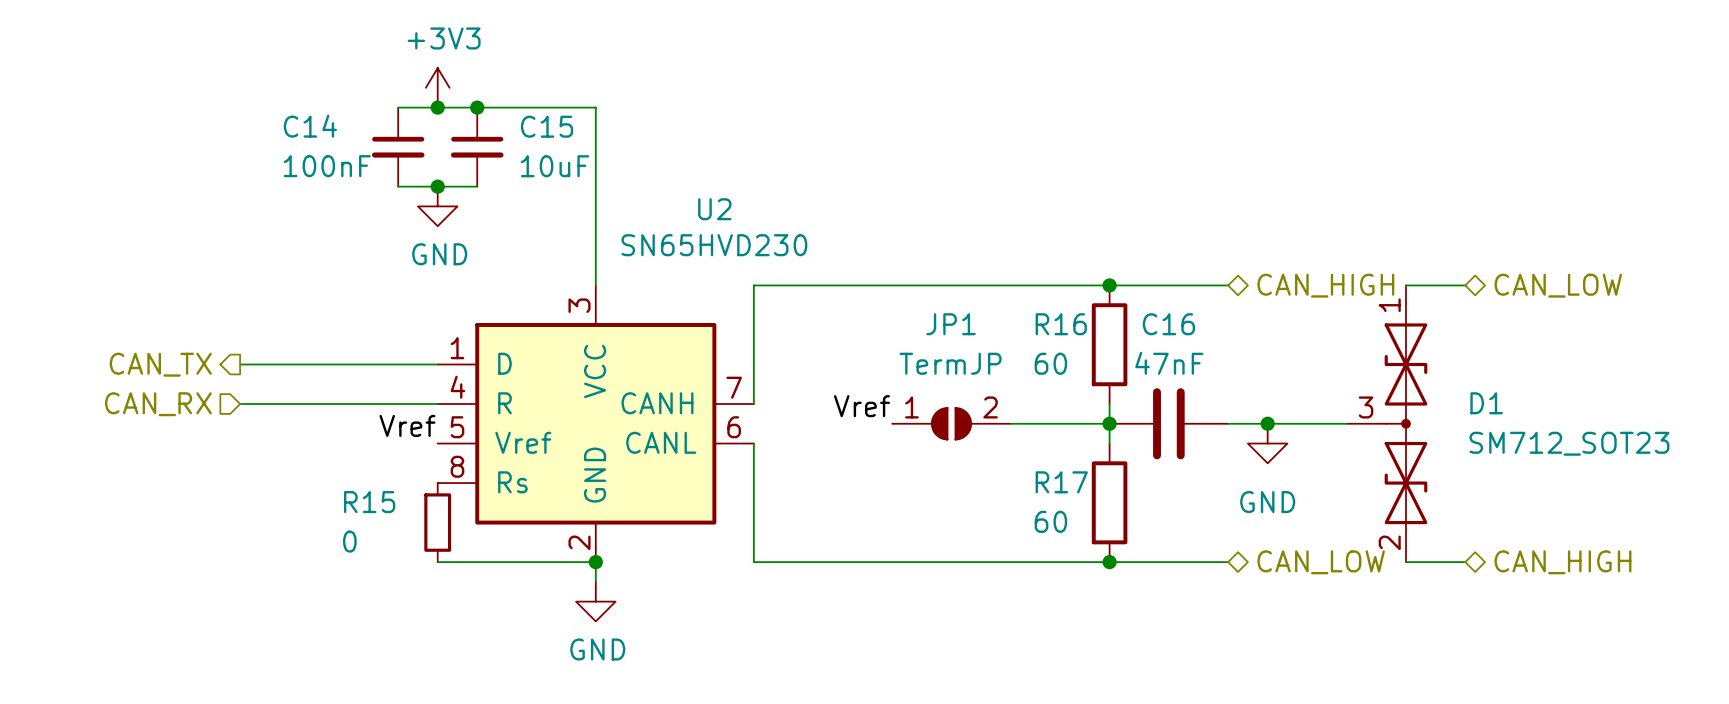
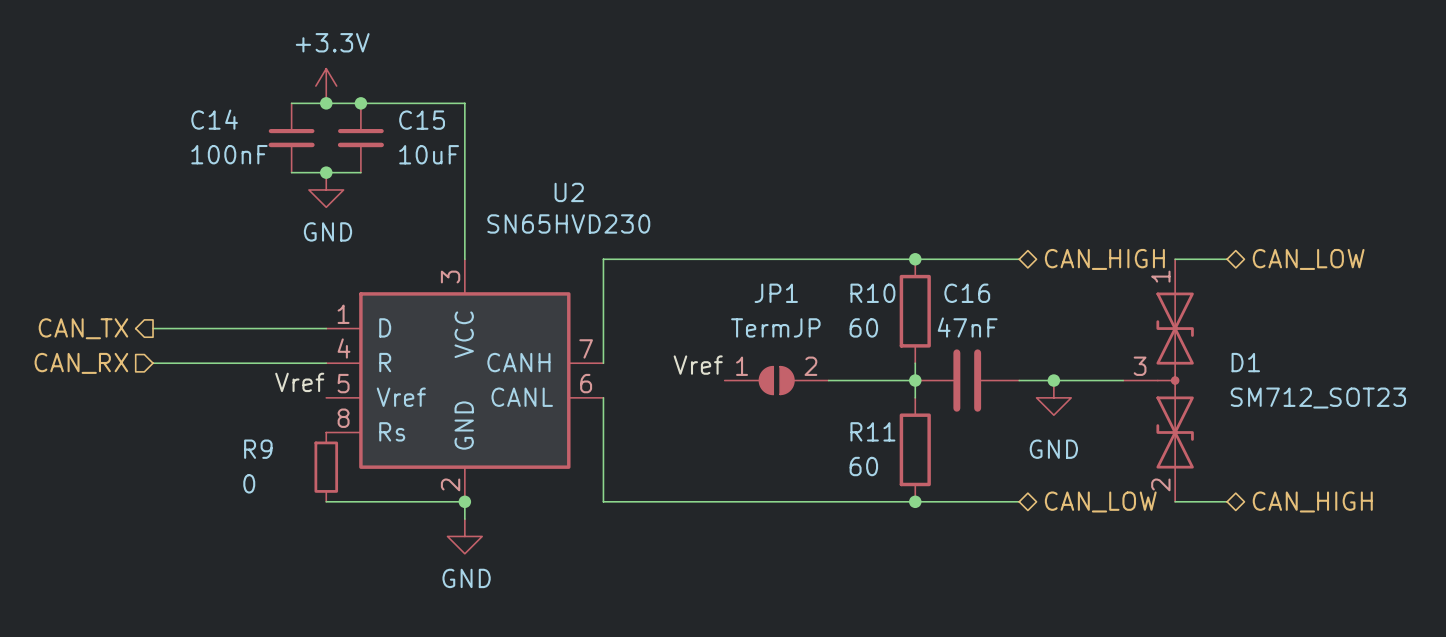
power symbol: +3V3 (437, 87) -> +3.3V (326, 86)
R16 name: R16 (1061, 324) -> R10 (872, 293)
R17 name: R17 (1061, 482) -> R11 (872, 431)
R15 name: R15 (369, 502) -> R9 (258, 449)

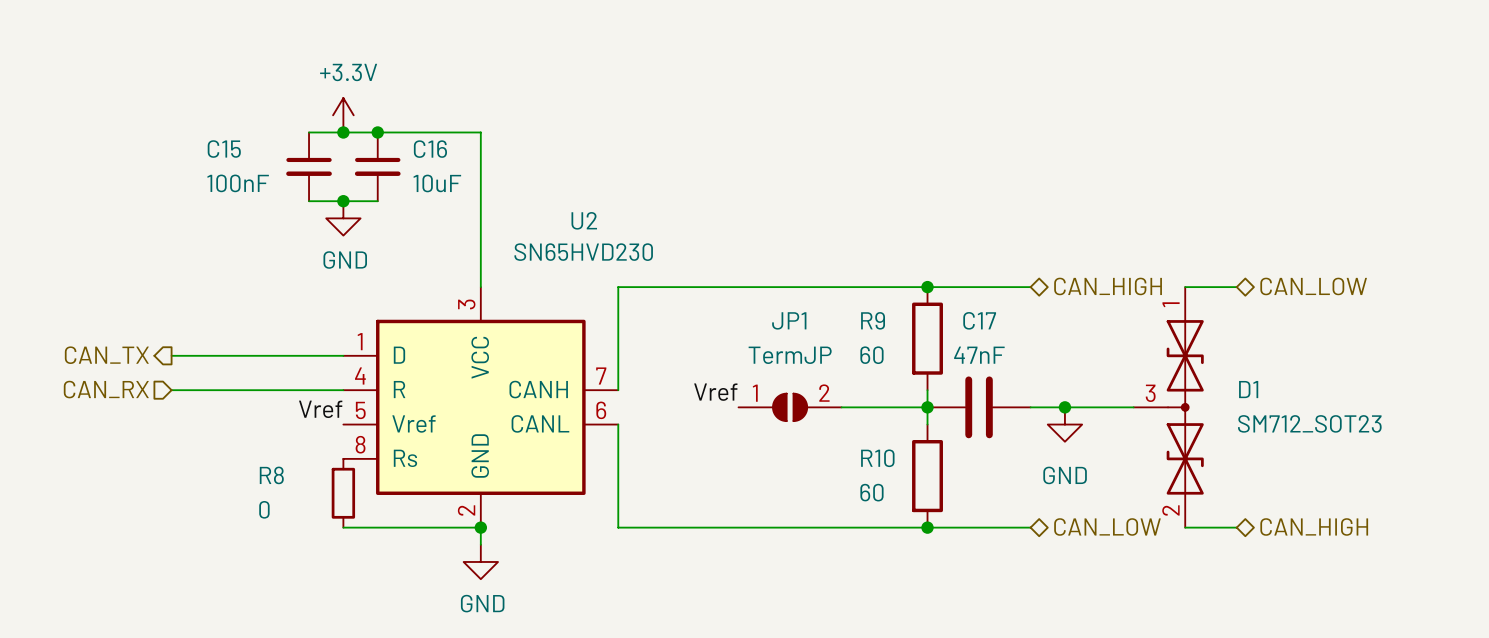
C14 name: C14 (214, 119) -> C15 (224, 149)
C15 name: C15 (422, 120) -> C16 (430, 149)
R10 name: R10 (872, 293) -> R9 (873, 320)
C16 name: C16 (967, 293) -> C17 (979, 320)
R11 name: R11 (872, 431) -> R10 (877, 458)
R9 name: R9 (258, 449) -> R8 (271, 475)

